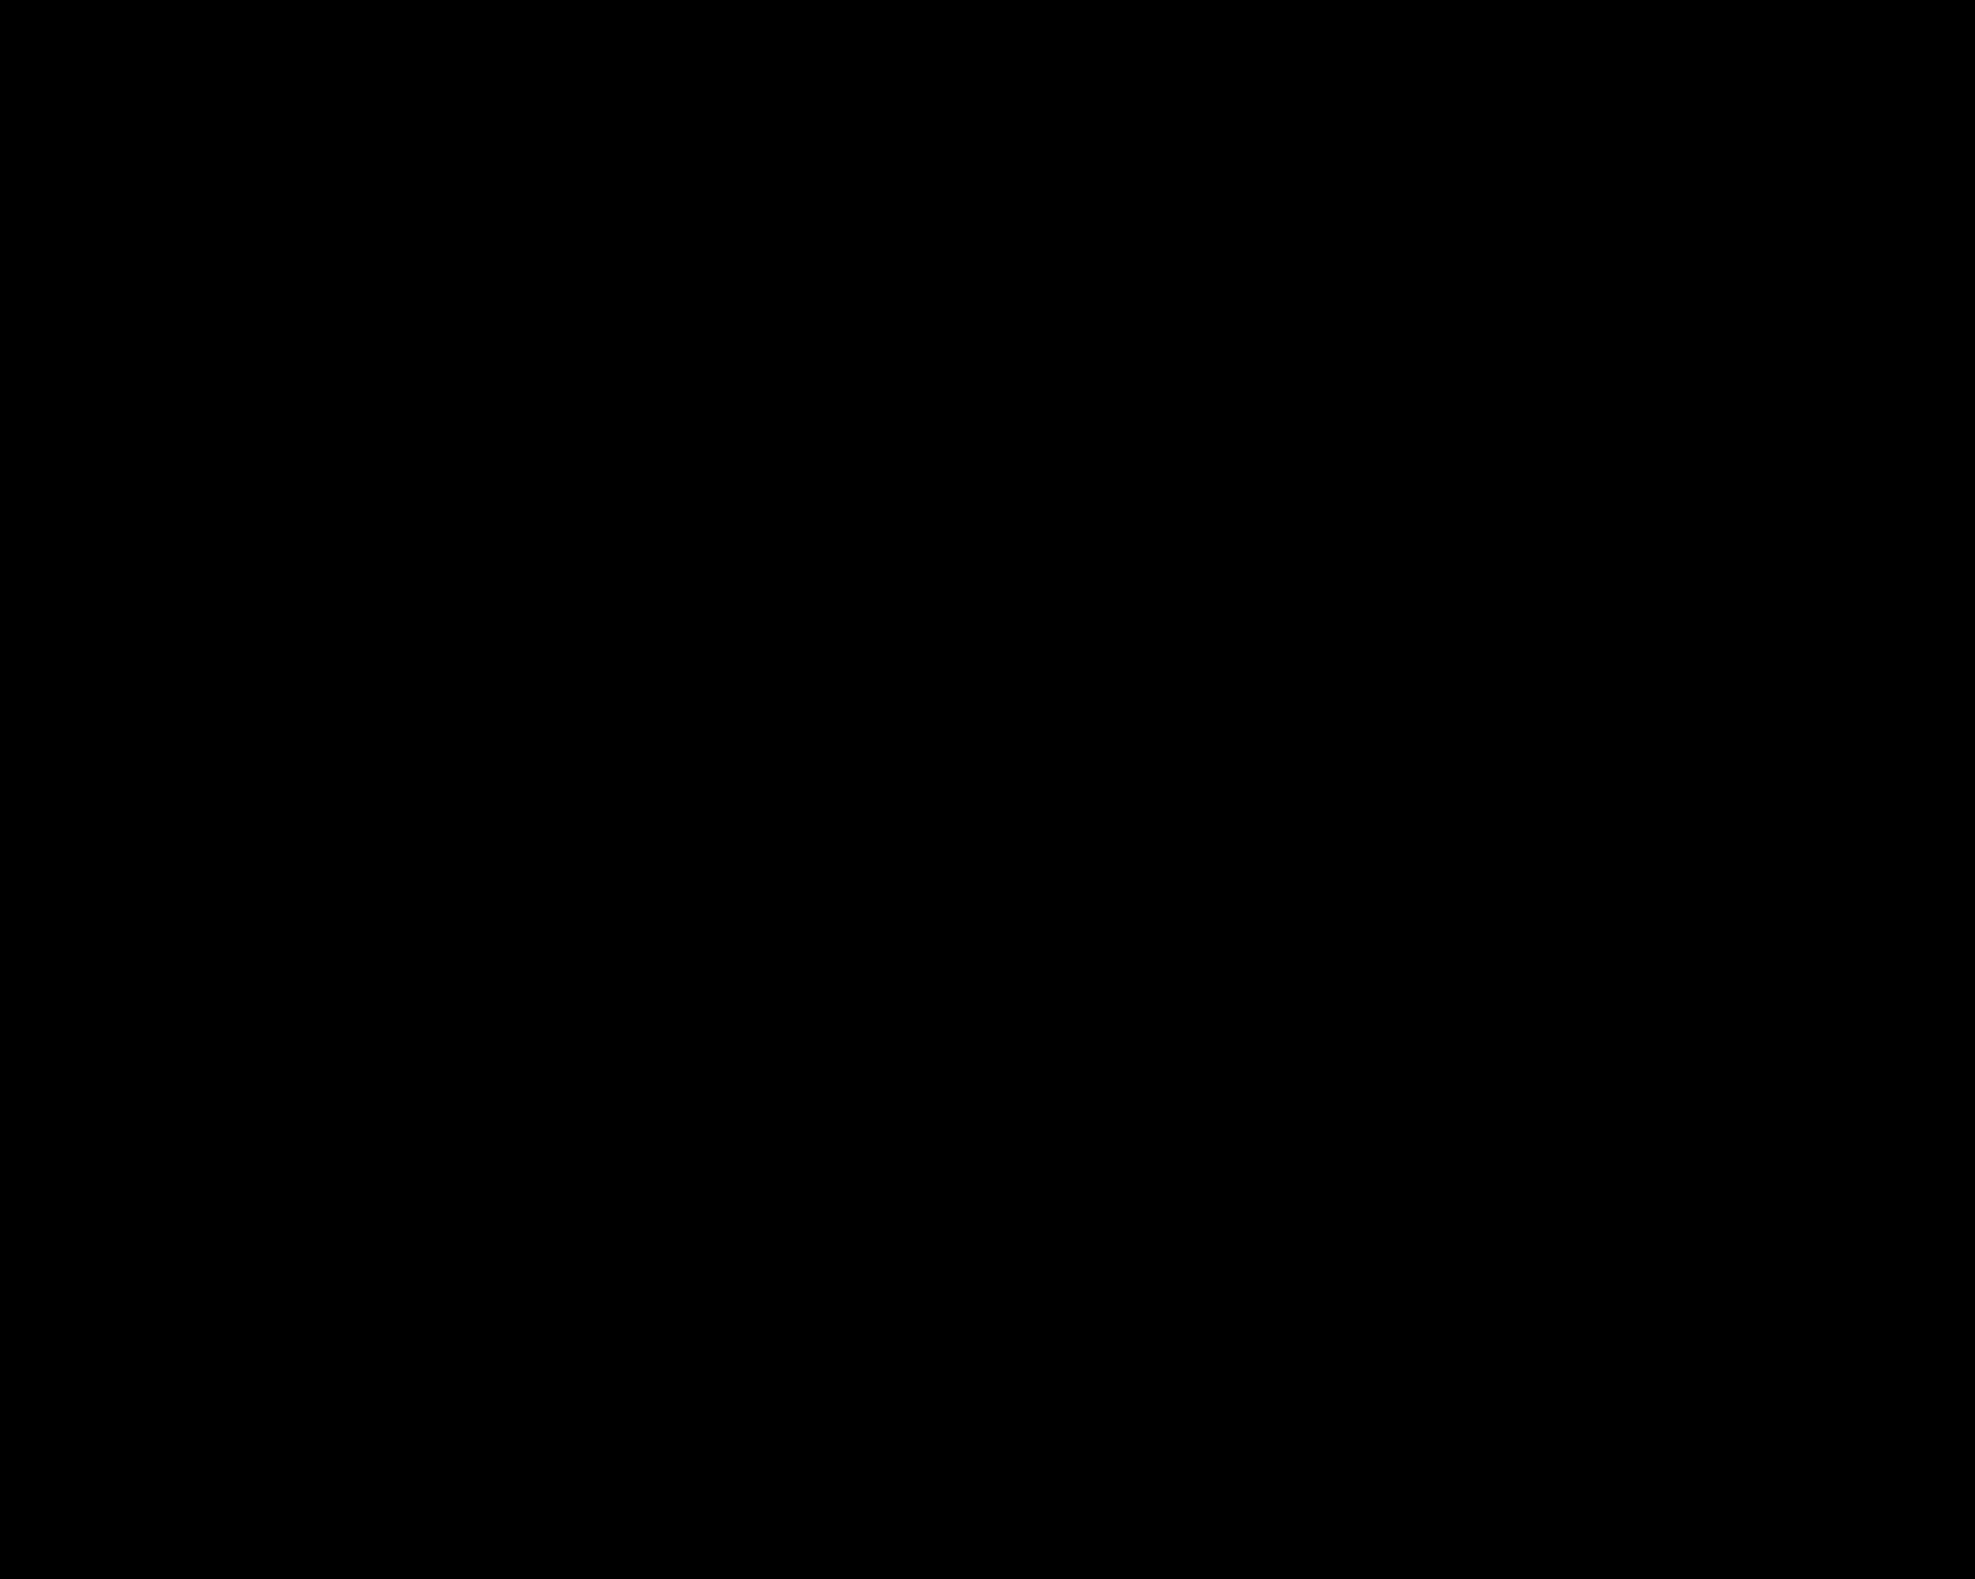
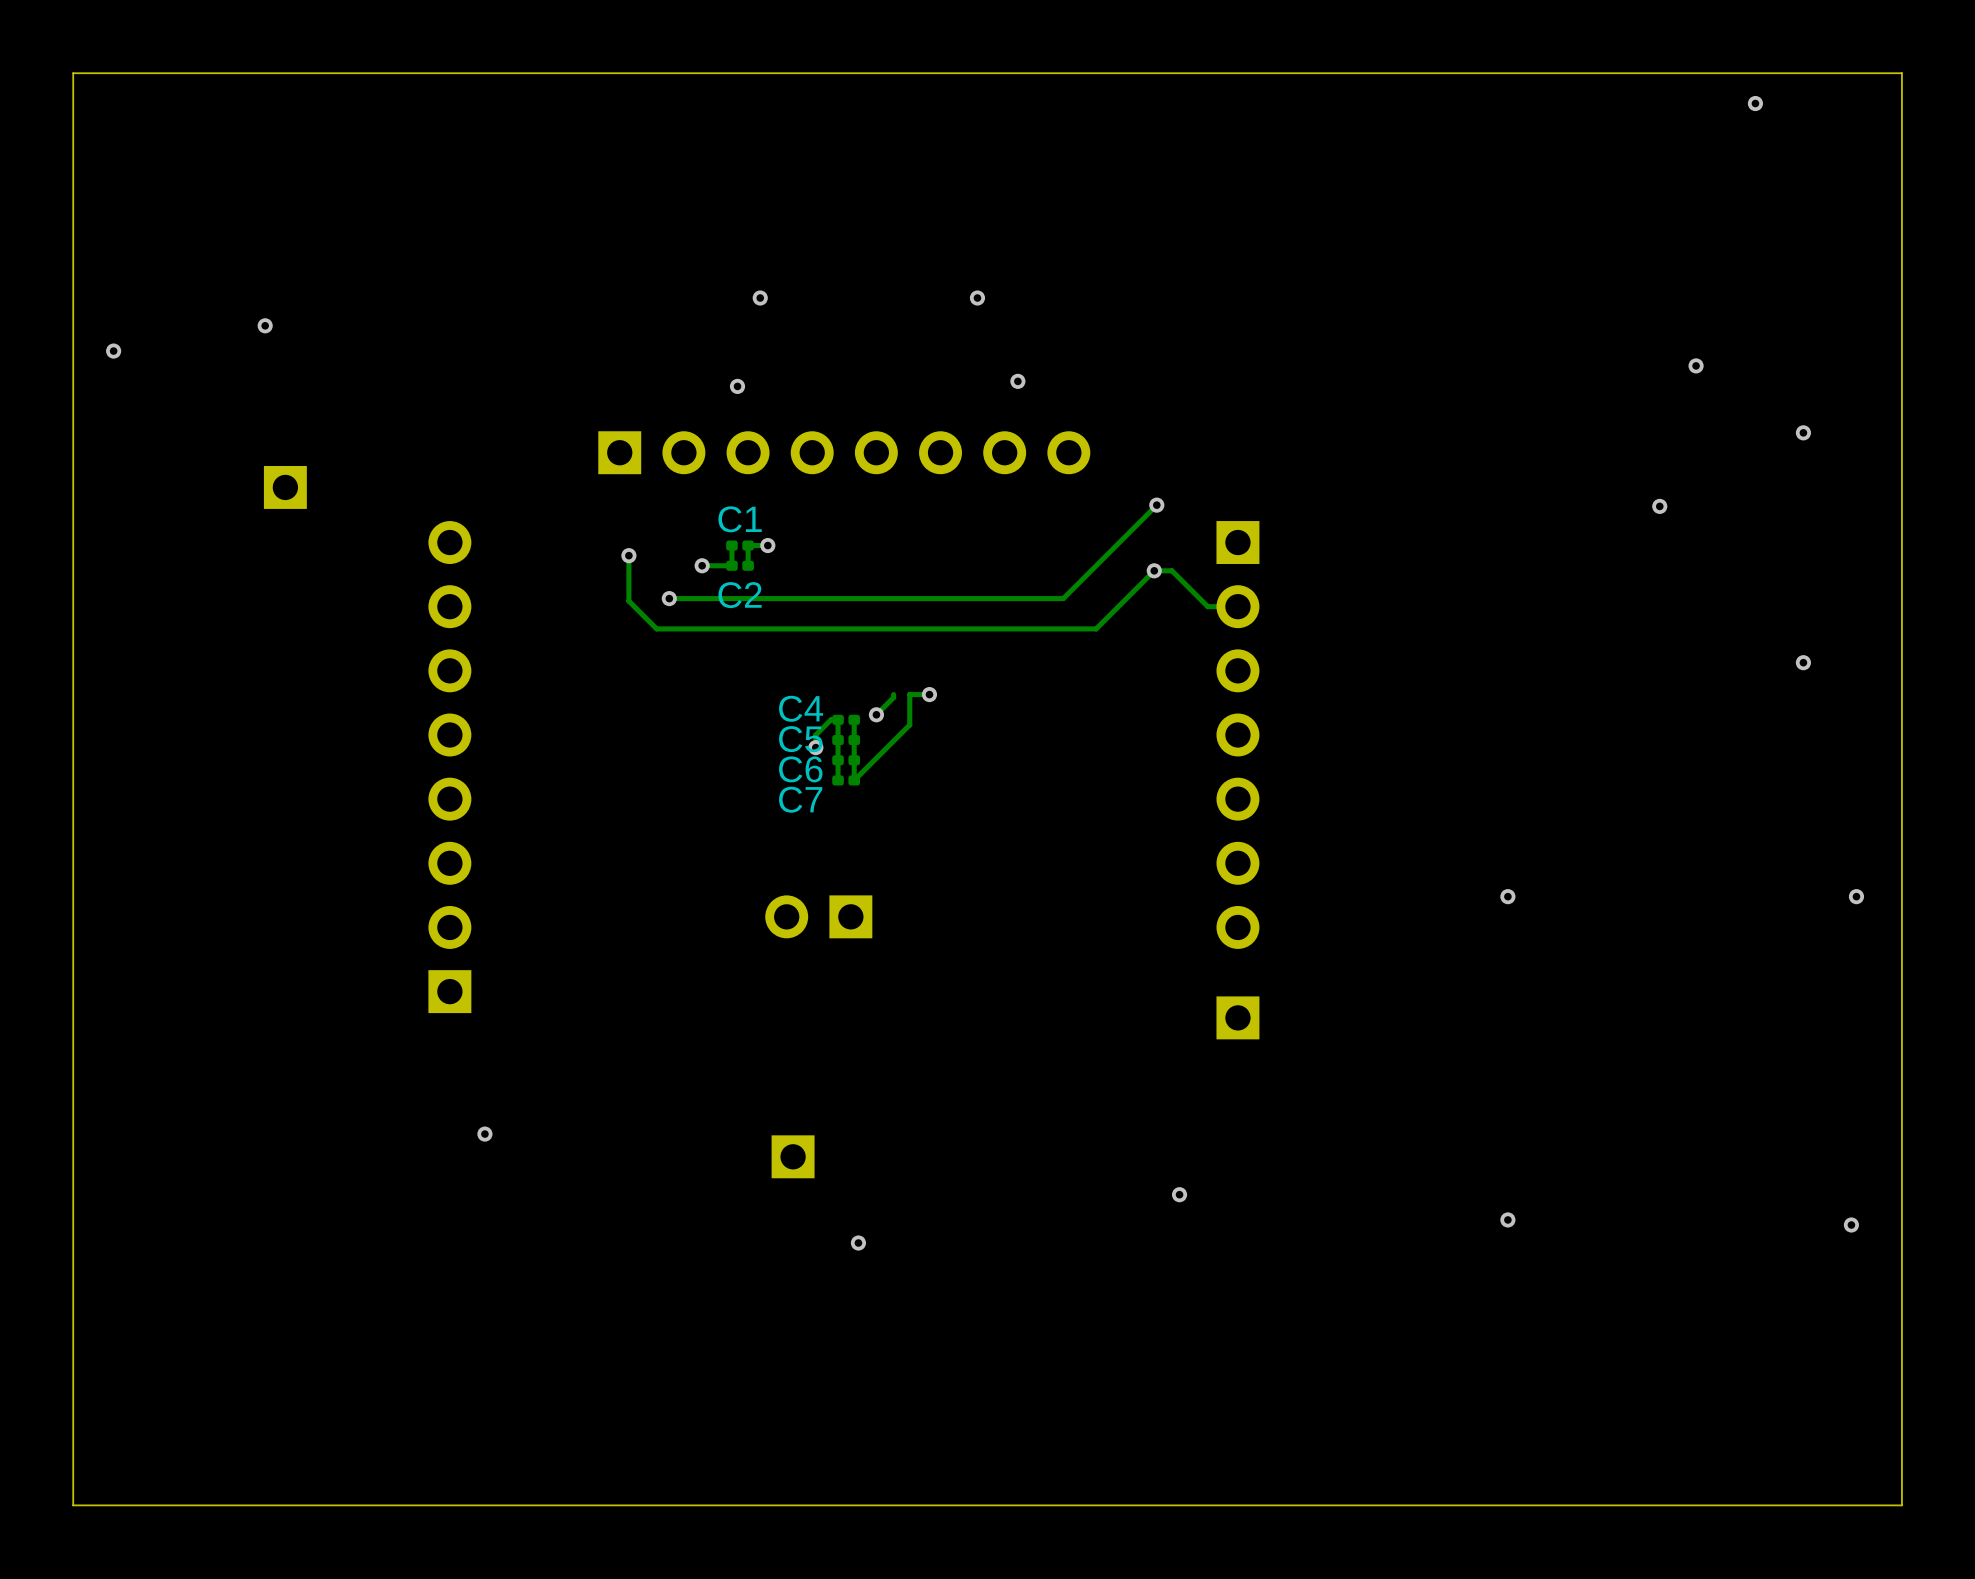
board edge: none -> (1901, 73) (73, 73) (73, 1505) (1901, 1505) (1901, 73)
via: none -> (1755, 103)
via: none -> (760, 298)
via: none -> (977, 298)
via: none -> (265, 325)
via: none -> (113, 351)
via: none -> (1696, 365)
via: none -> (1017, 381)
via: none -> (737, 386)
via: none -> (1803, 432)
part: none -> (844, 452)
part: none -> (285, 487)
track: none -> (1156, 505) (1063, 598) (669, 598)
via: none -> (1156, 505)
via: none -> (1659, 506)
track: none -> (731, 545) (731, 565) (702, 565)
C1: none -> (740, 545)
track: none -> (767, 545) (748, 545) (748, 565)
via: none -> (767, 545)
track: none -> (628, 555) (628, 601) (656, 628) (1096, 628) (1154, 570) (1171, 570) (1207, 606) (1237, 606)
via: none -> (628, 555)
via: none -> (702, 565)
C2: none -> (740, 565)
via: none -> (1154, 570)
via: none -> (669, 598)
via: none -> (1803, 662)
track: none -> (893, 694) (893, 697) (876, 714)
track: none -> (929, 694) (909, 694) (909, 724) (854, 780) (854, 719)
via: none -> (929, 694)
via: none -> (876, 714)
C4: none -> (846, 719)
part: none -> (1237, 734)
C5: none -> (846, 740)
track: none -> (815, 747) (815, 734) (830, 719) (838, 719) (838, 780)
via: none -> (815, 747)
C6: none -> (846, 760)
part: none -> (449, 767)
C7: none -> (846, 780)
via: none -> (1507, 896)
via: none -> (1856, 896)
part: none -> (818, 916)
part: none -> (1237, 1017)
via: none -> (484, 1134)
part: none -> (793, 1156)
via: none -> (1179, 1194)
via: none -> (1507, 1219)
via: none -> (1851, 1225)
via: none -> (858, 1243)

